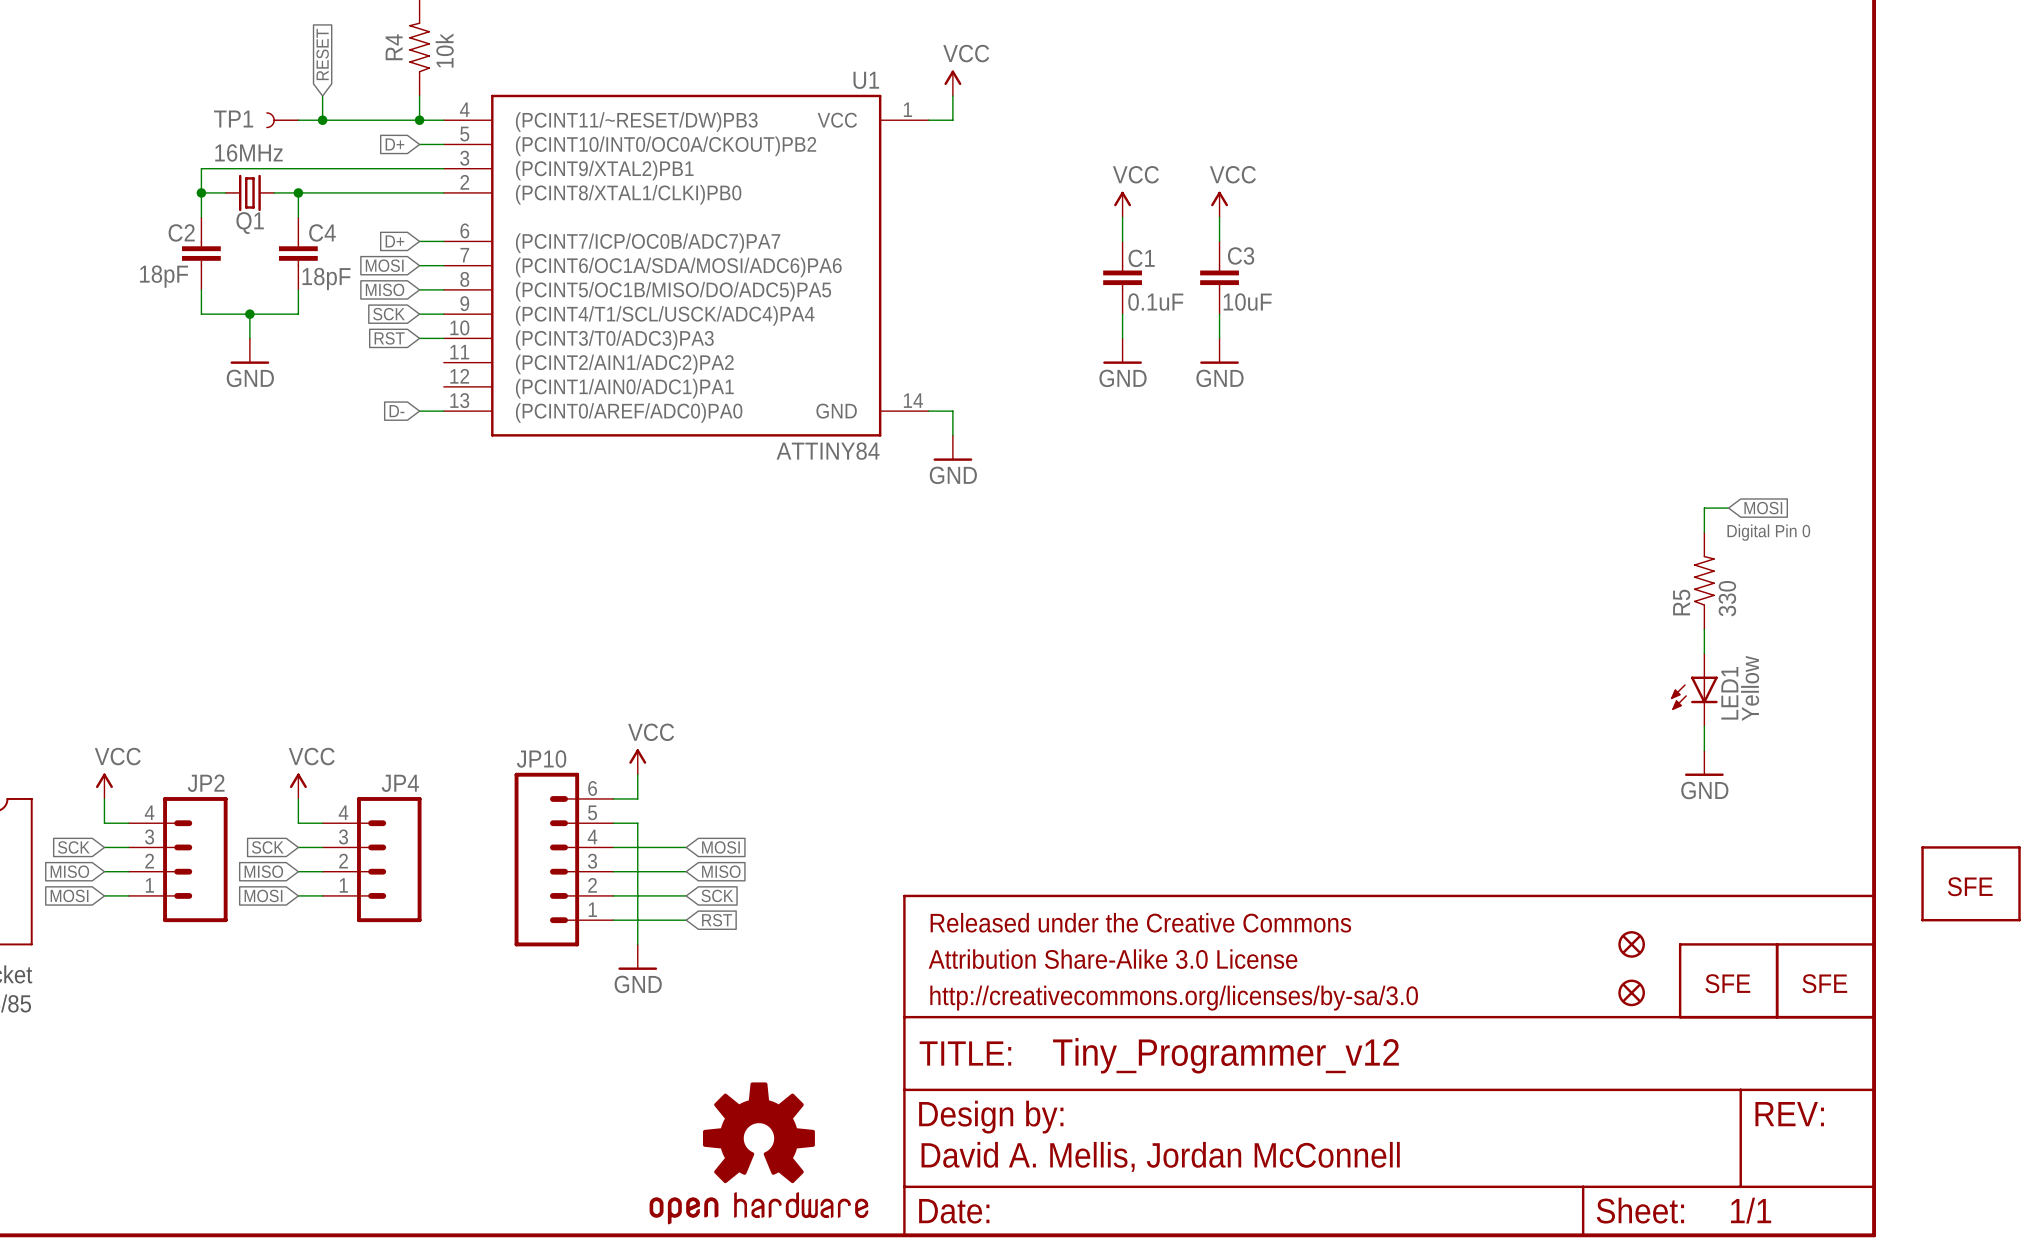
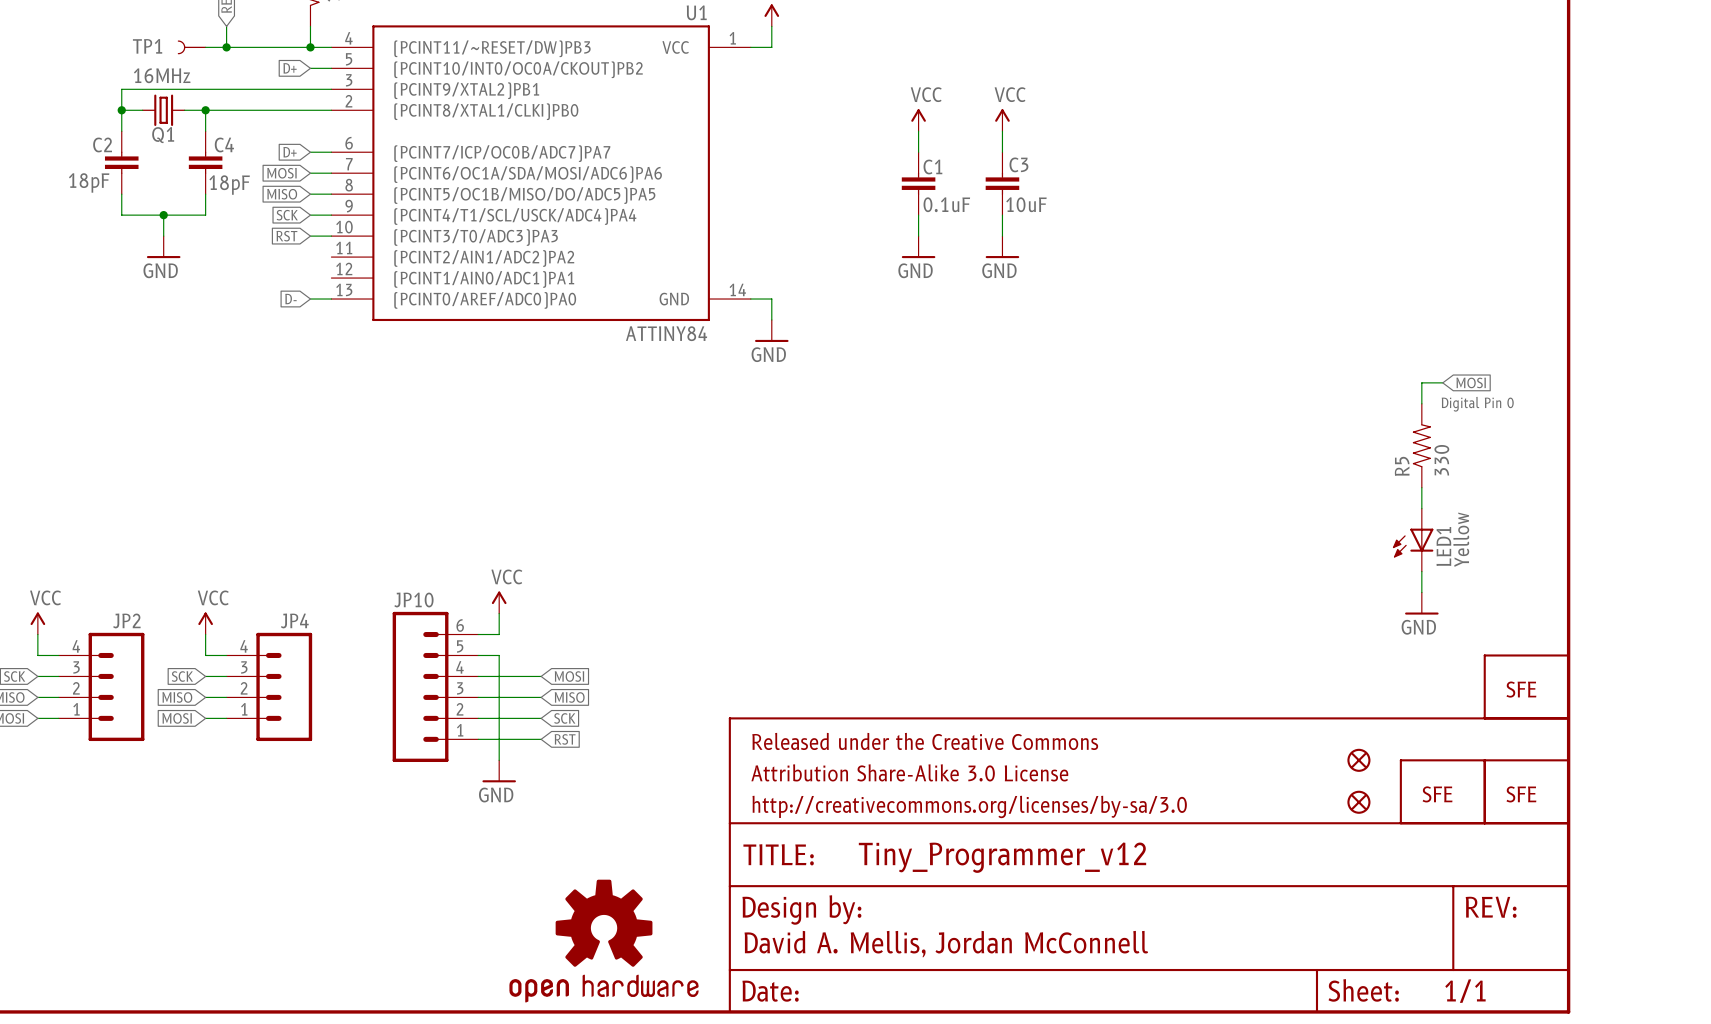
part position: (1971, 883) -> (1526, 686)

